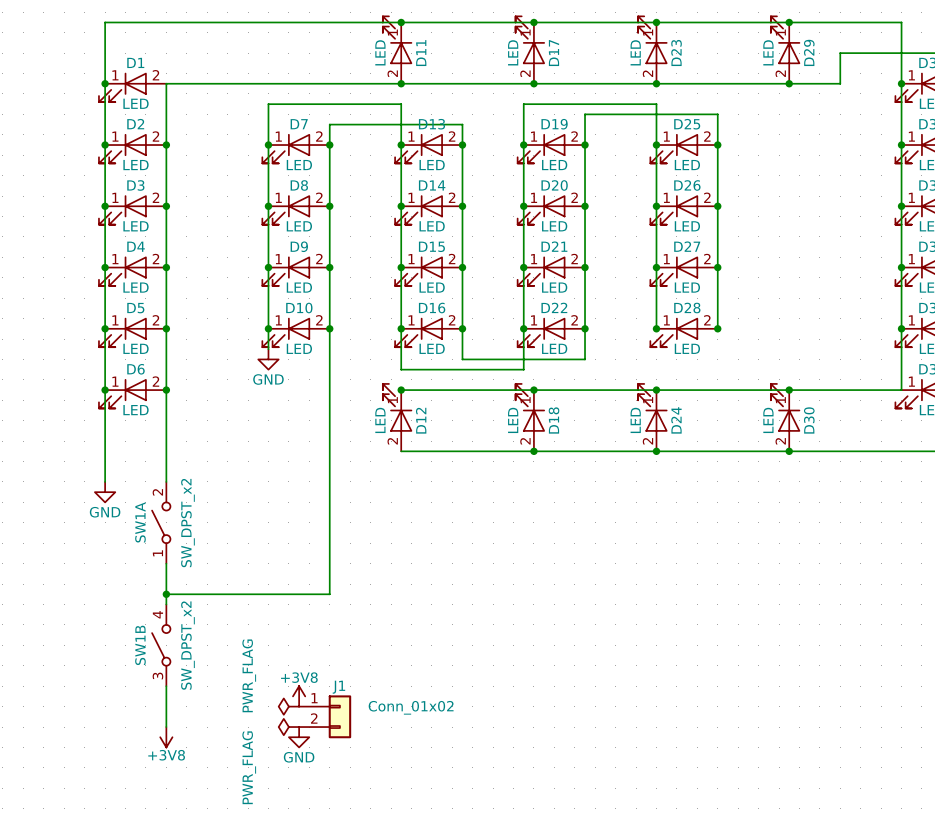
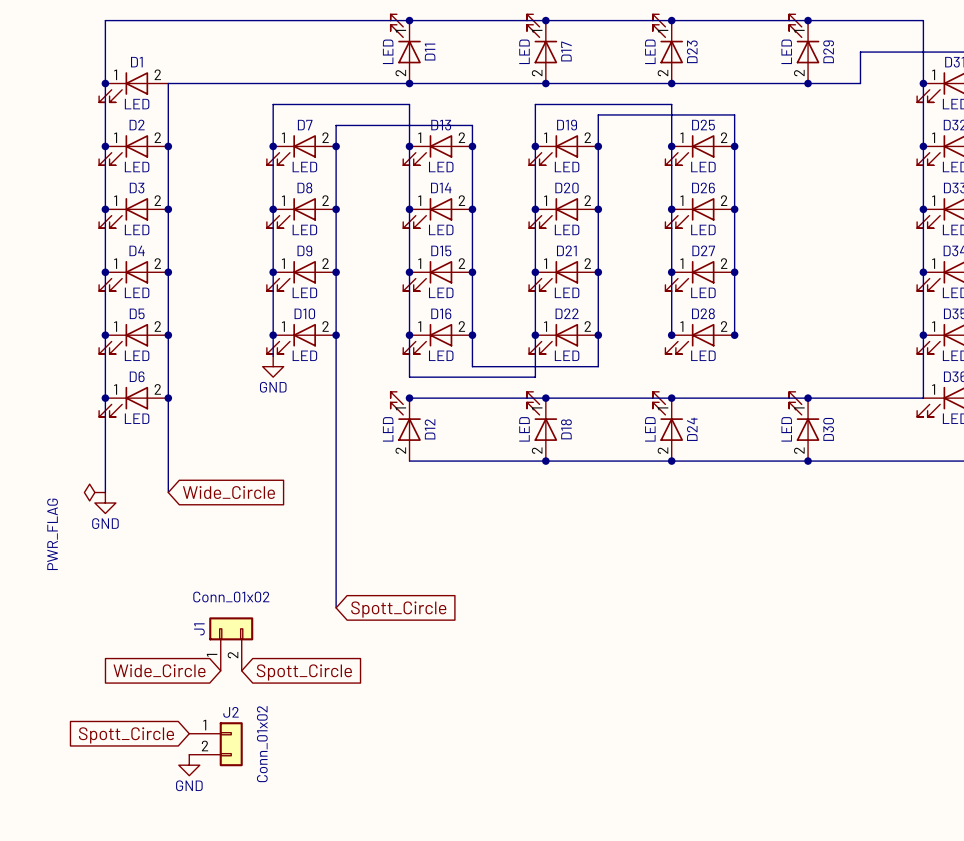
power symbol: none -> PWR_FLAG (94, 492)
global label: none -> Wide_Circle (228, 492)
SW1A: SW_DPST_x2 (161, 522) -> none
wire: (166, 563) (166, 604) -> none
wire: (166, 594) (329, 594) -> none
junction: (166, 594) -> none
global label: none -> Spott_Circle (398, 609)
SW1B: SW_DPST_x2 (161, 645) -> none
global label: none -> Wide_Circle (159, 670)
global label: none -> Spott_Circle (304, 672)
wire: (166, 686) (166, 727) -> none
power symbol: +3V8 (299, 696) -> none
power symbol: PWR_FLAG (288, 706) -> none
J1 value position: Conn_01x02 (411, 707) -> Conn_01x02 (231, 597)
J1 position: (325, 716) -> (231, 644)
J1 rotation: 0° (339, 716) -> 90° counterclockwise (231, 628)
global label: none -> Spott_Circle (126, 735)
J2: none -> Conn_01x02 (216, 744)
power symbol: PWR_FLAG (288, 727) -> none
power symbol: +3V8 (166, 737) -> none
power symbol position: GND (299, 737) -> GND (189, 765)

